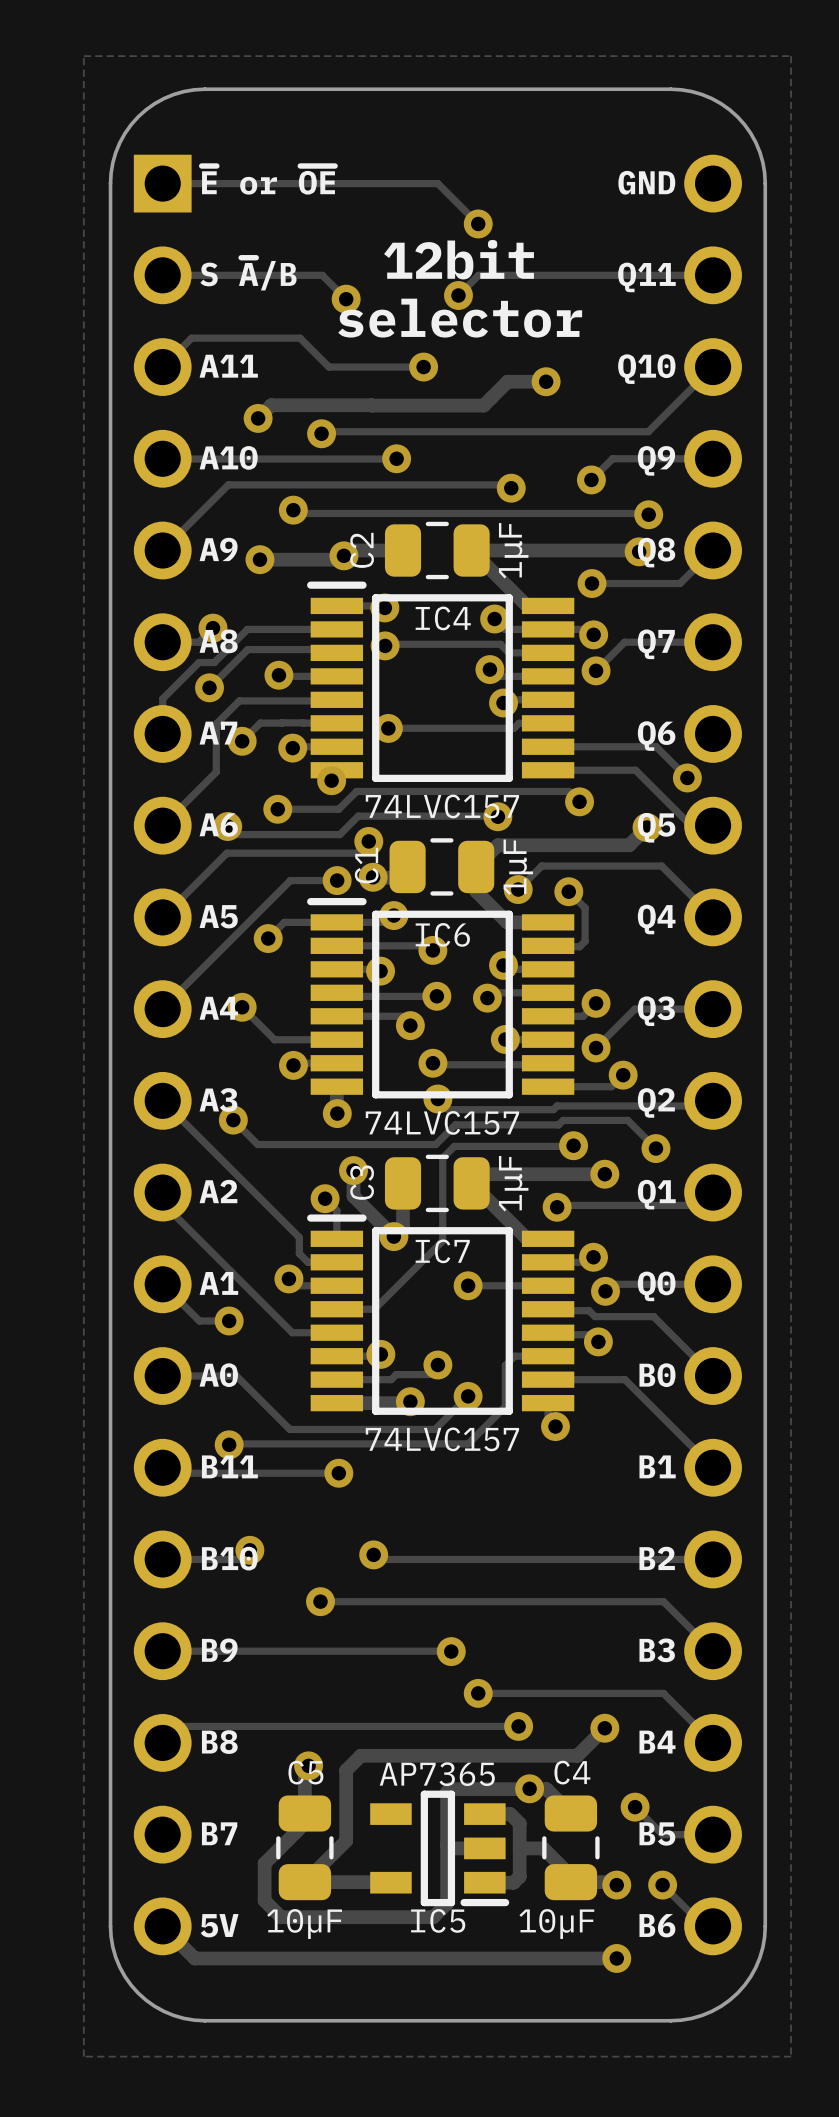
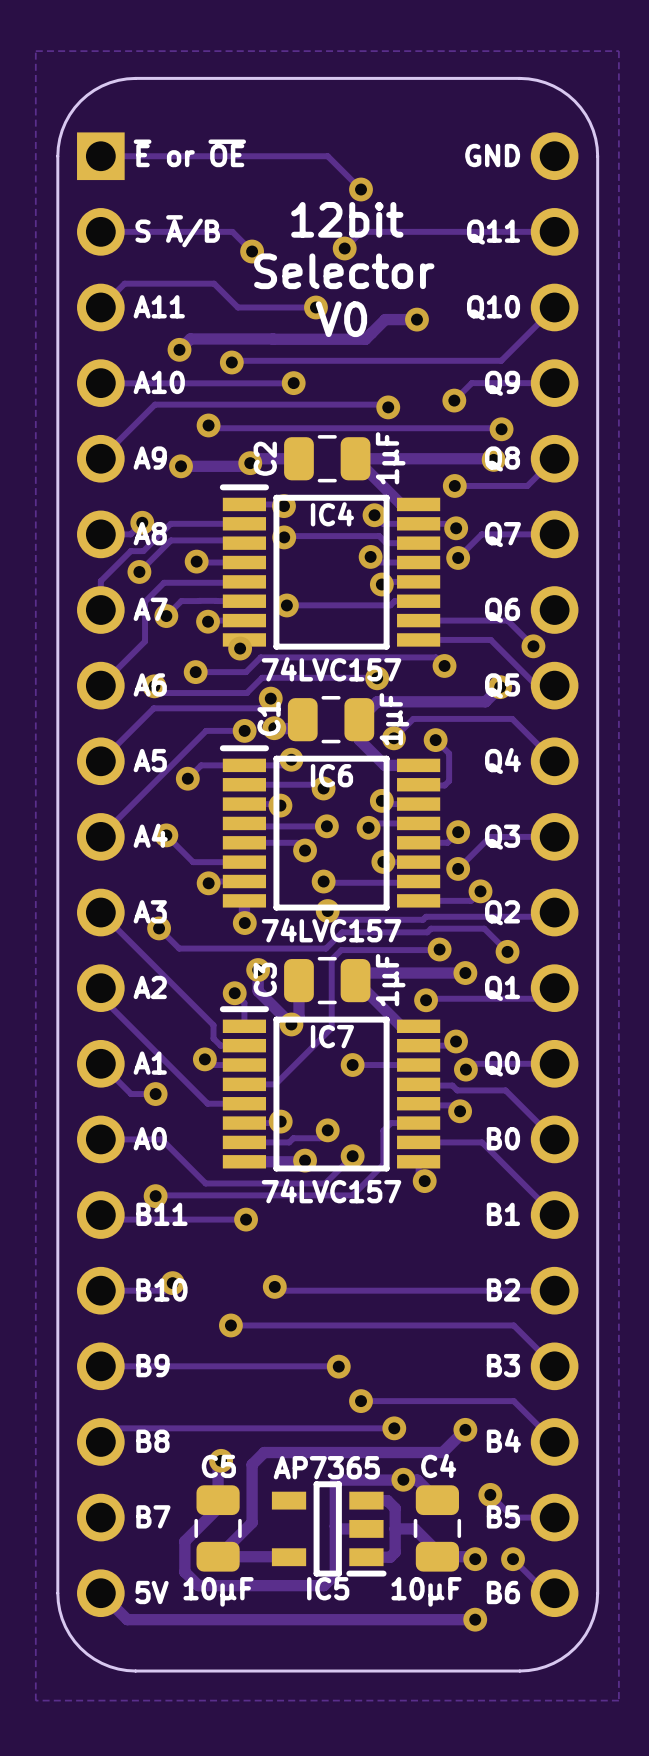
text: selector (460, 318) -> Selector (344, 271)
text: none -> V0 (341, 319)

